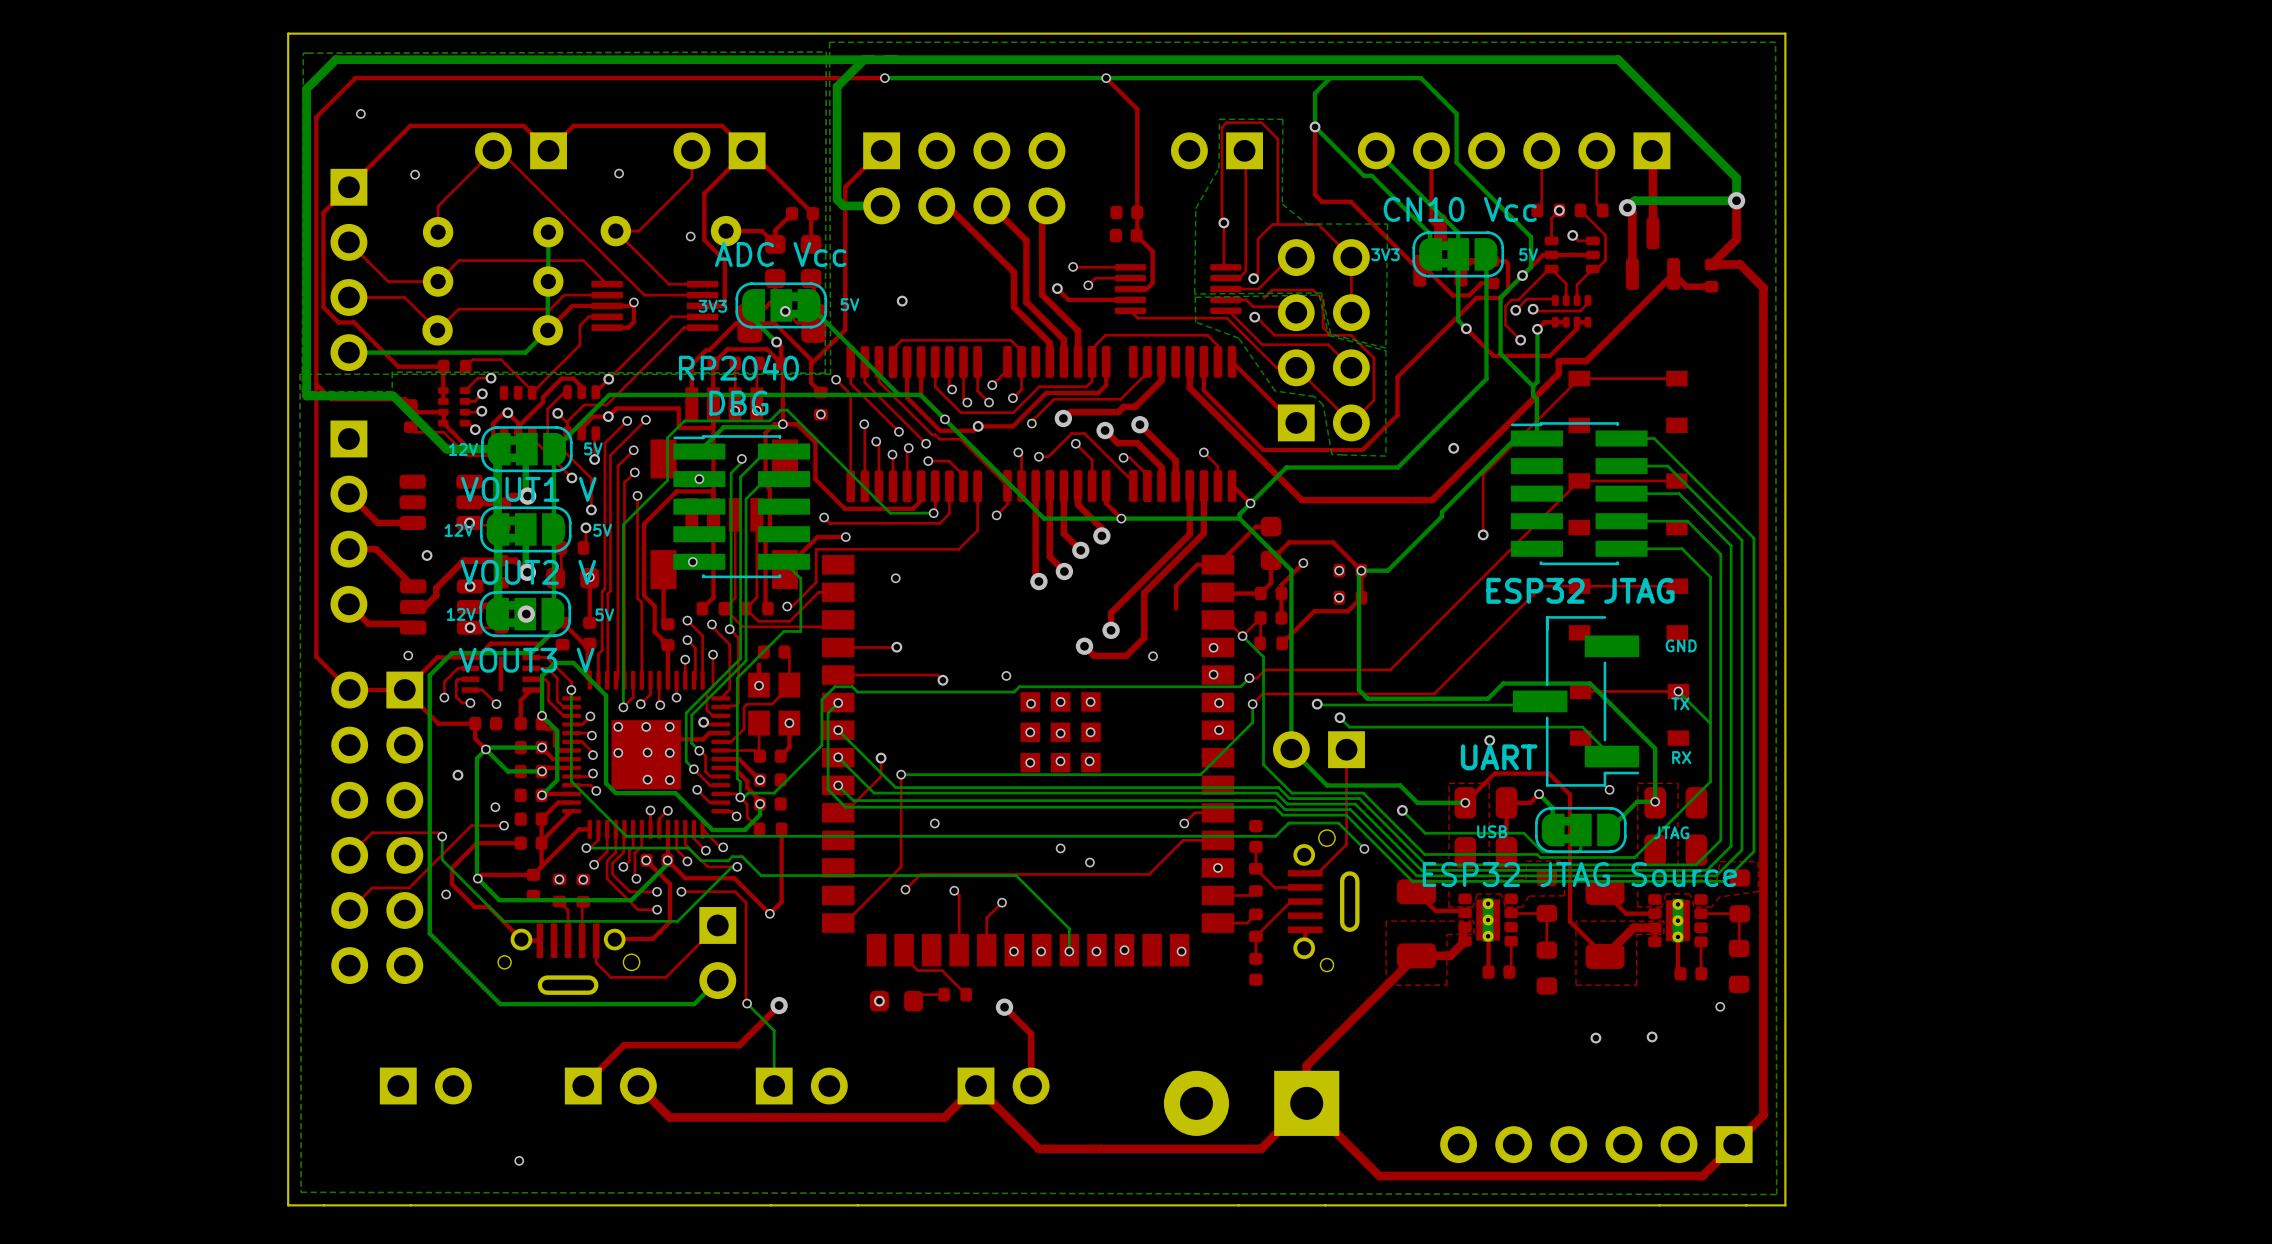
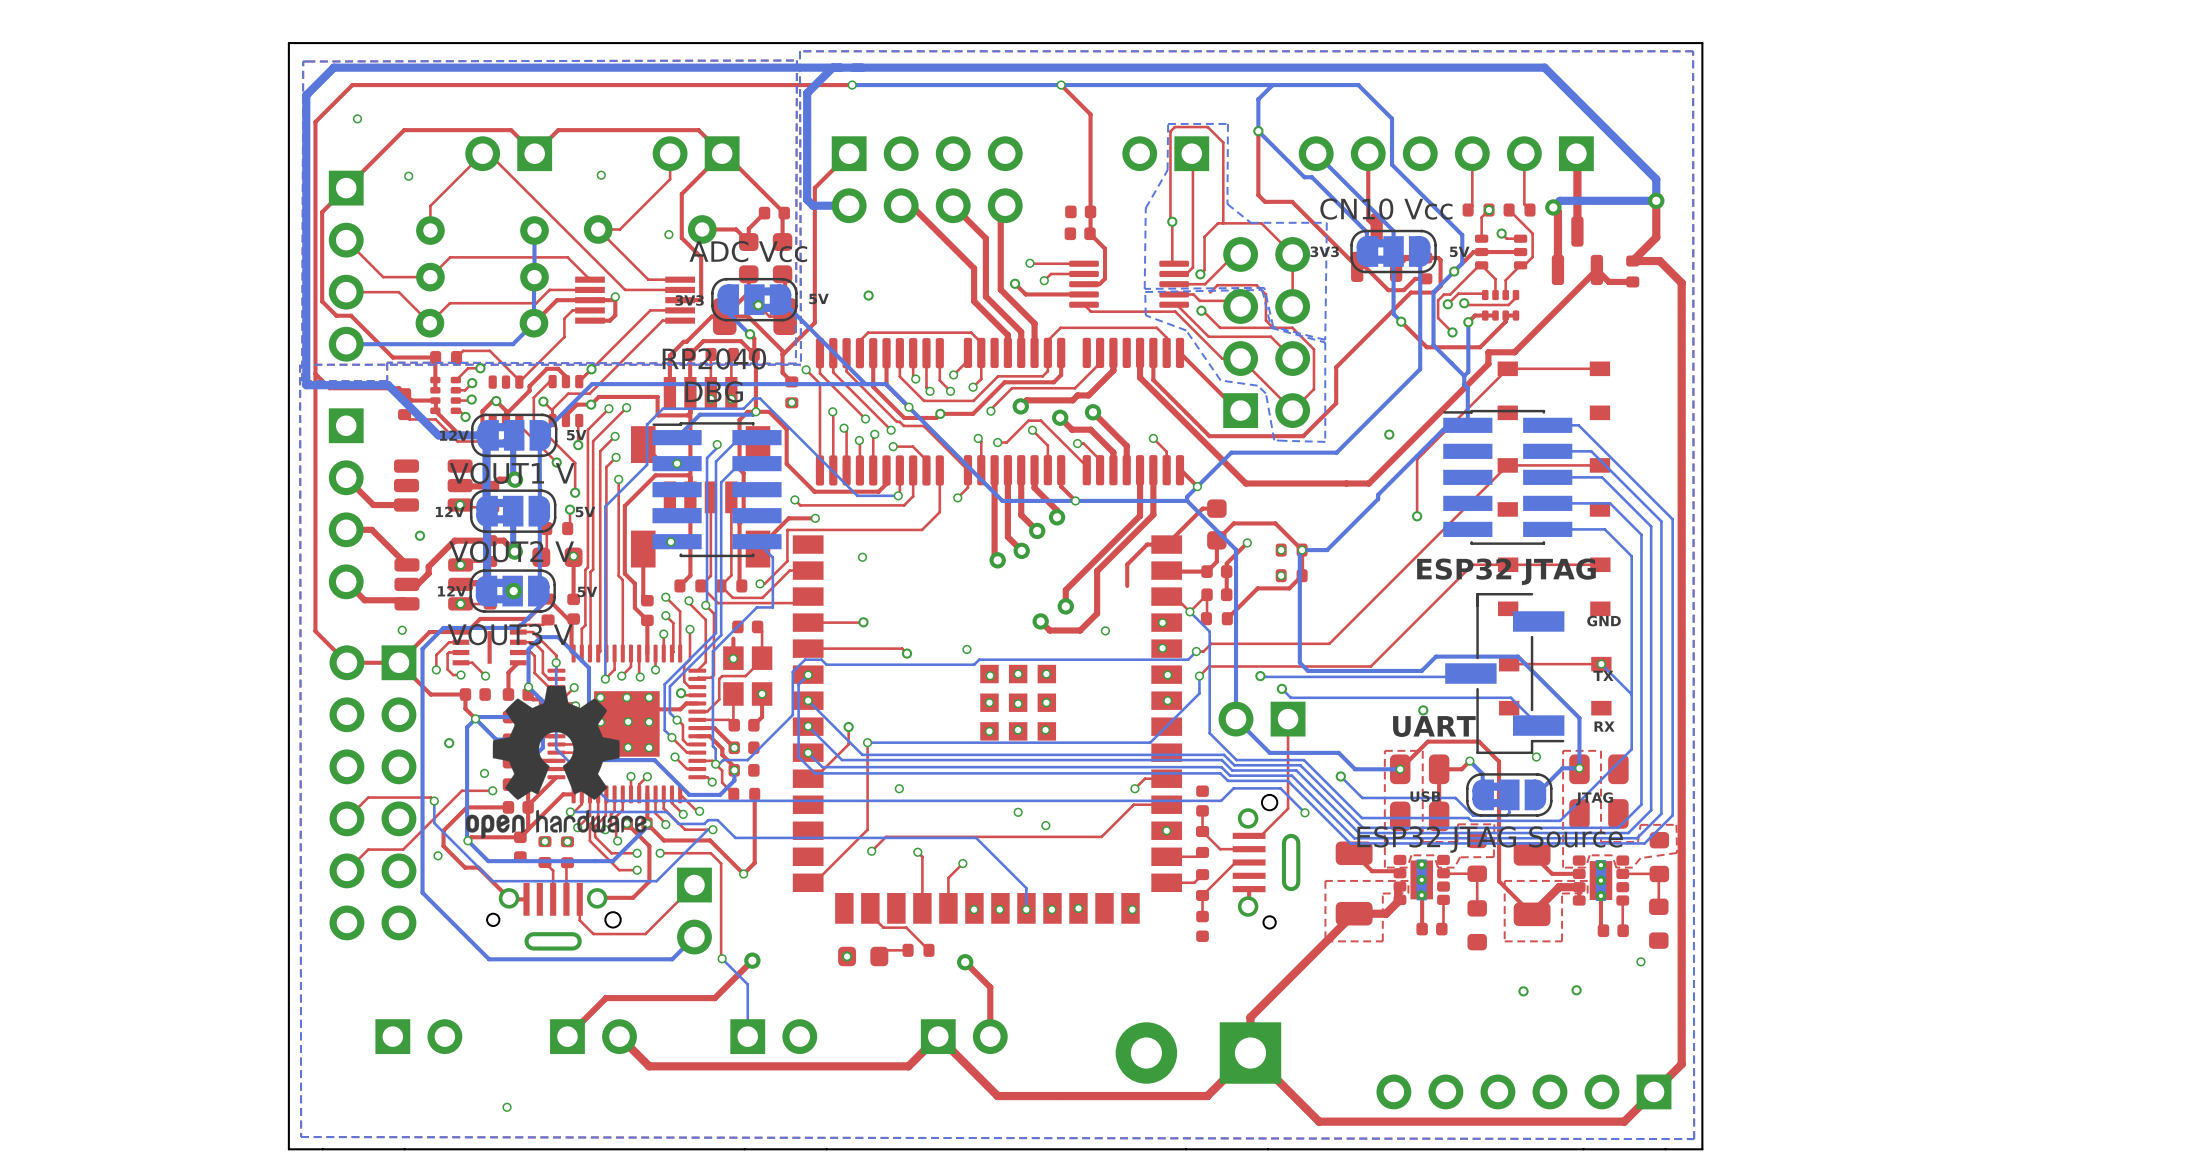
drawing: none -> [466, 685, 647, 839]

